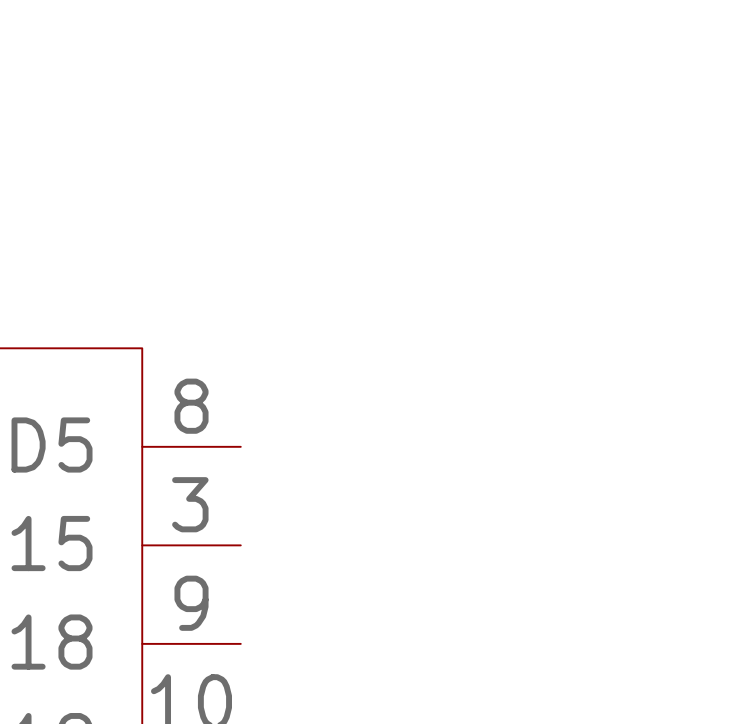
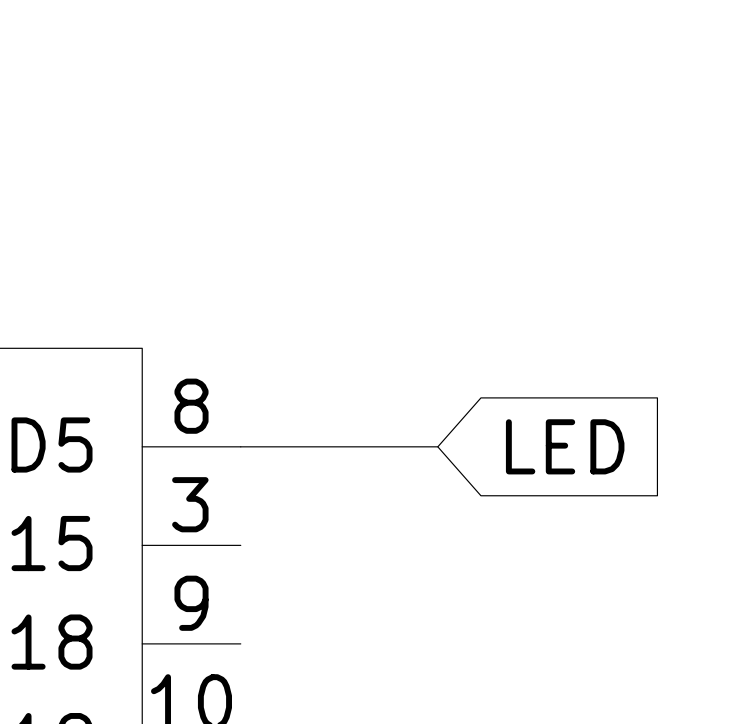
wire: none -> (240, 446) (437, 446)
global label: none -> LED (565, 446)

